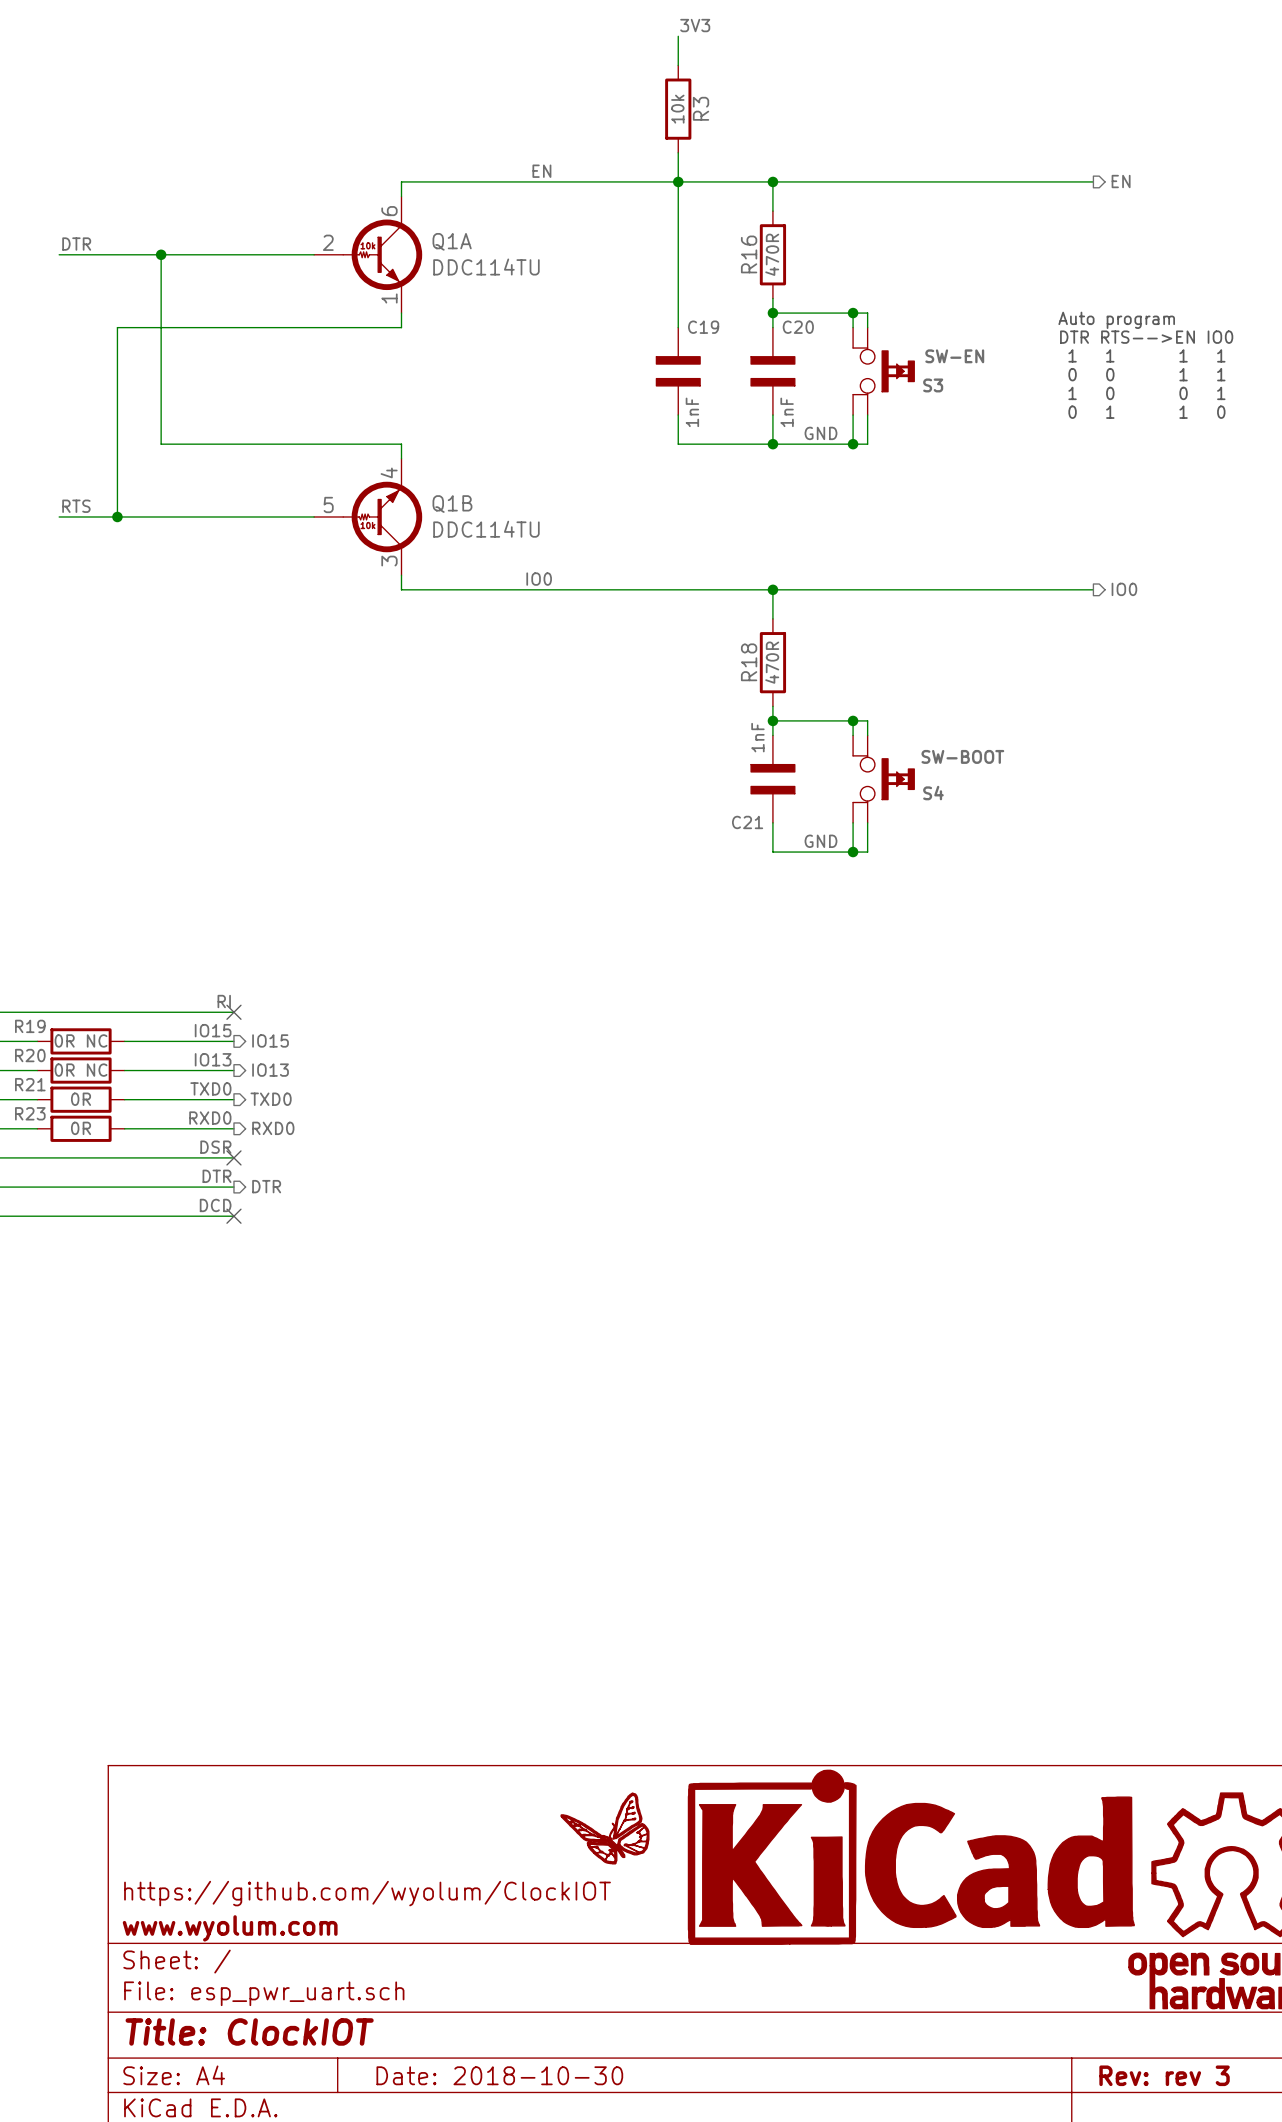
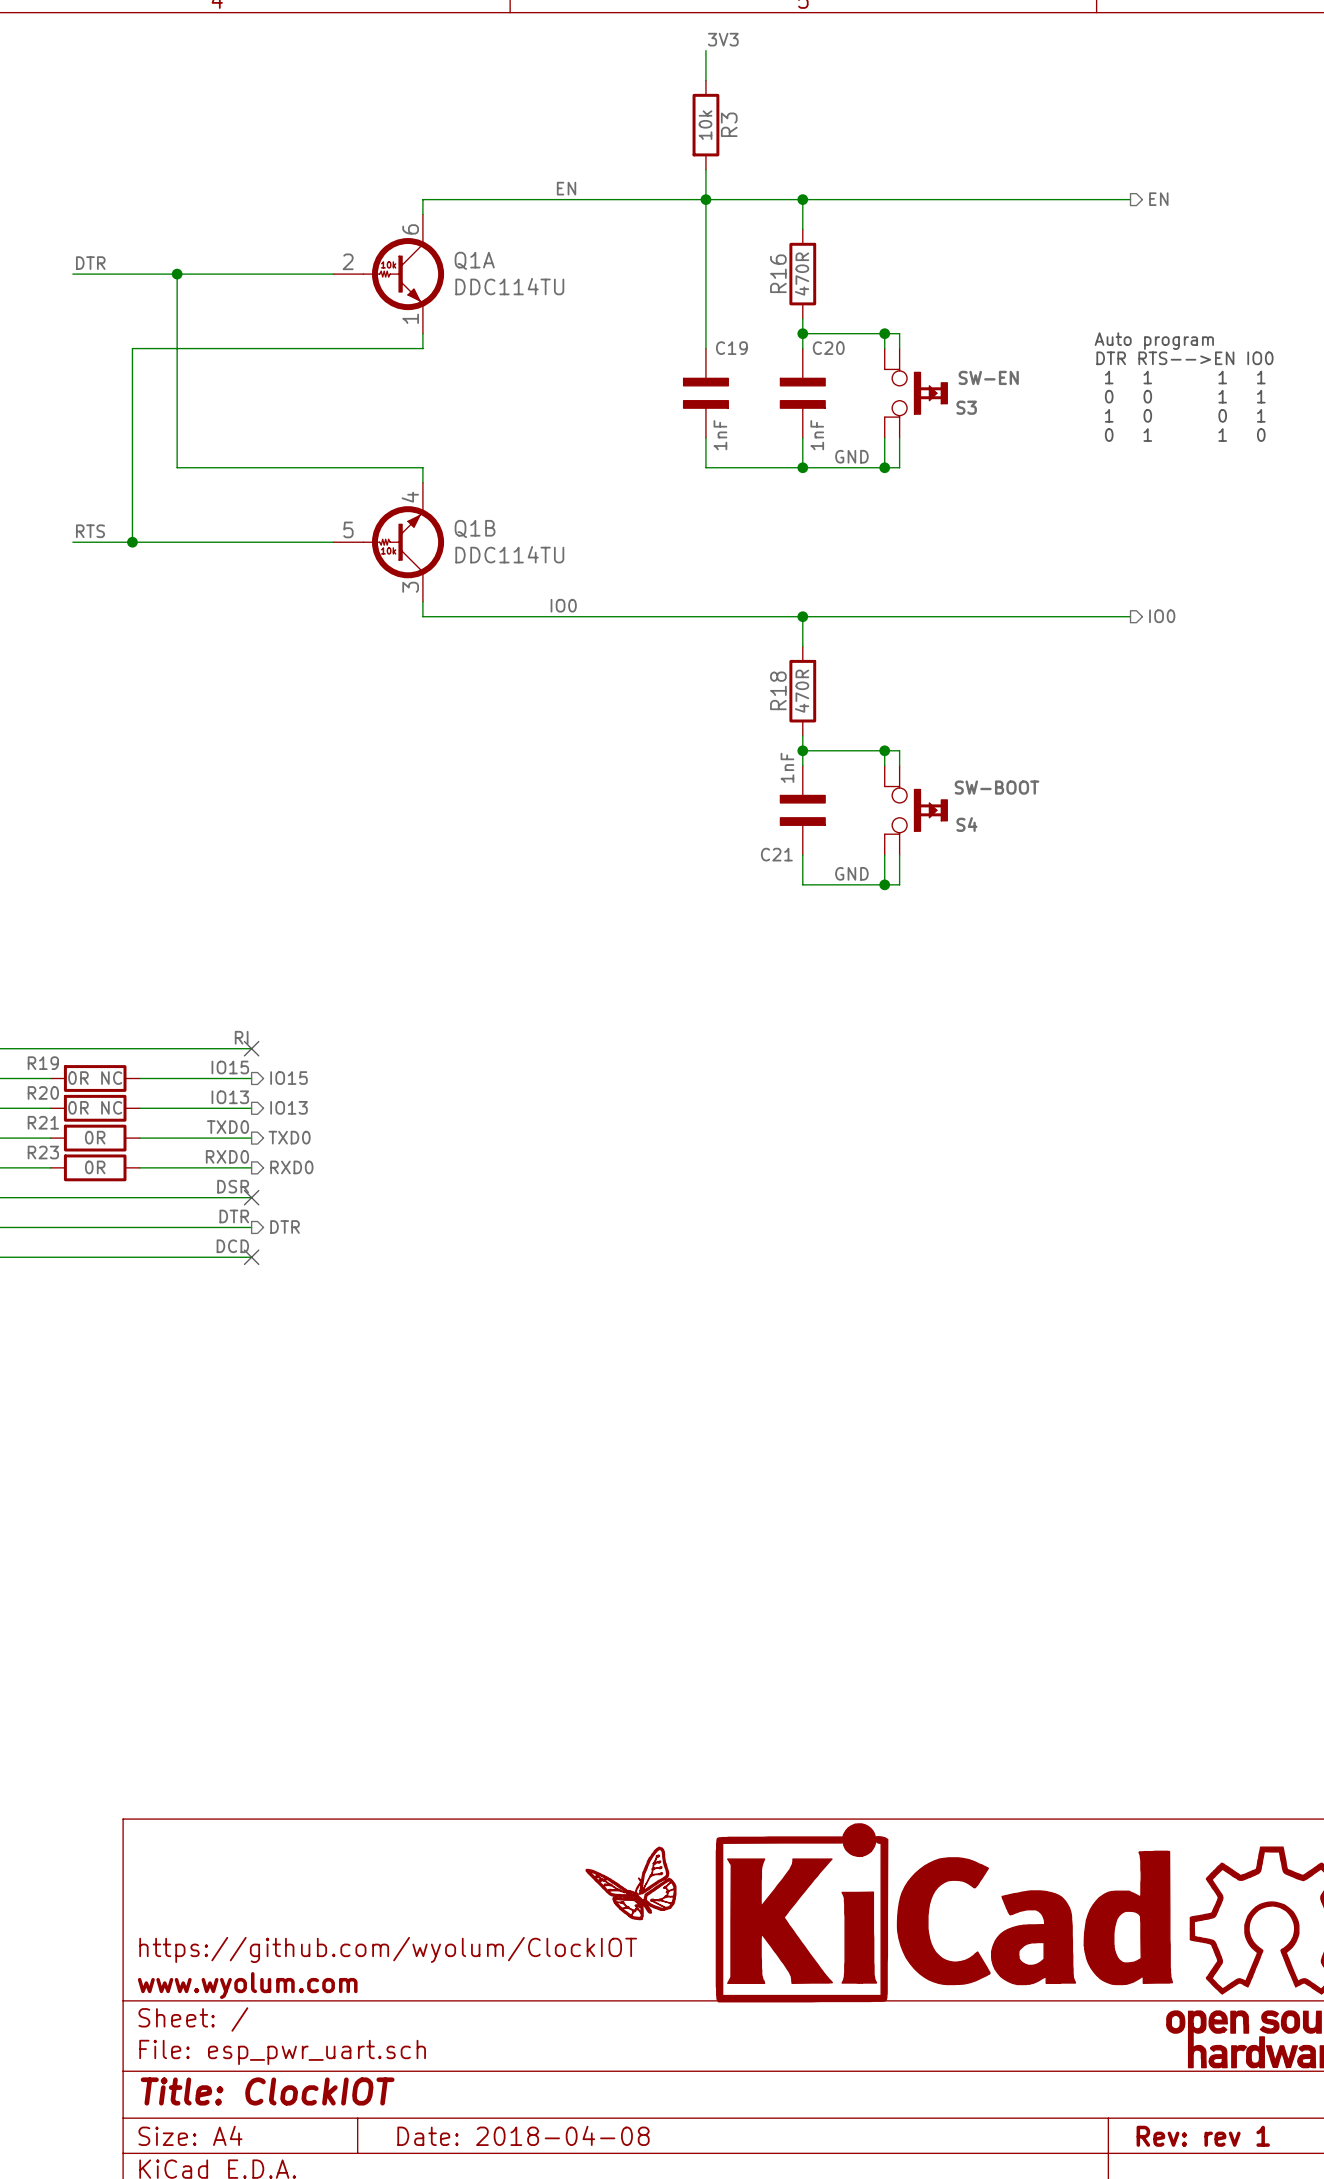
title block: Date: 2018-10-30 (499, 2075) -> Date: 2018-04-08 (523, 2135)
title block: Rev: rev 3 (1164, 2075) -> Rev: rev 1 (1203, 2136)

